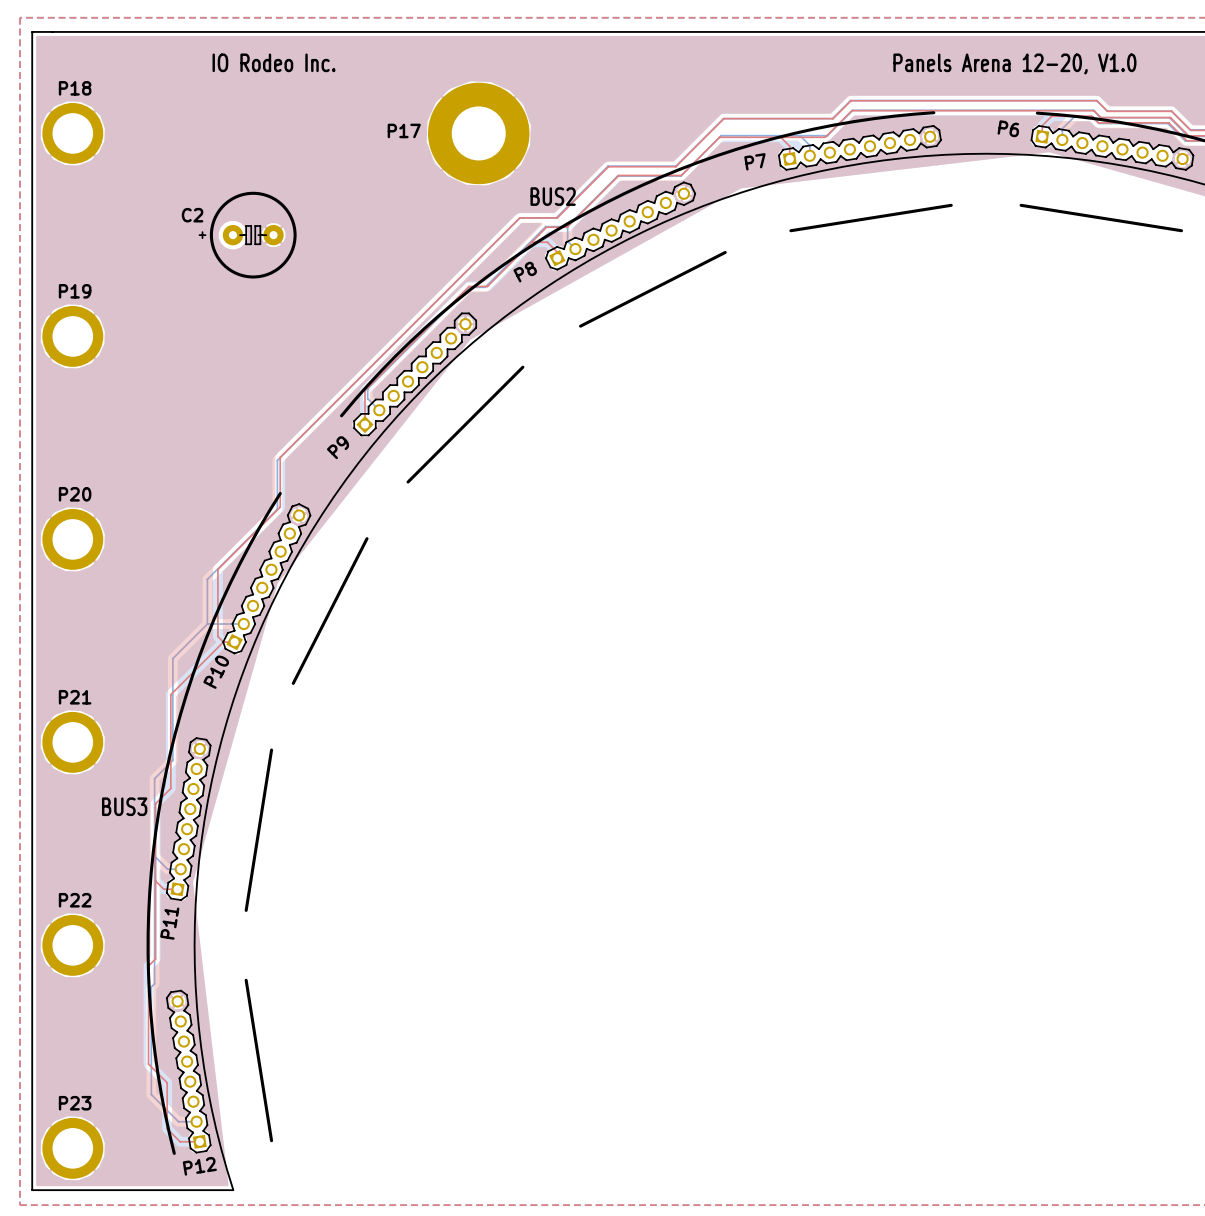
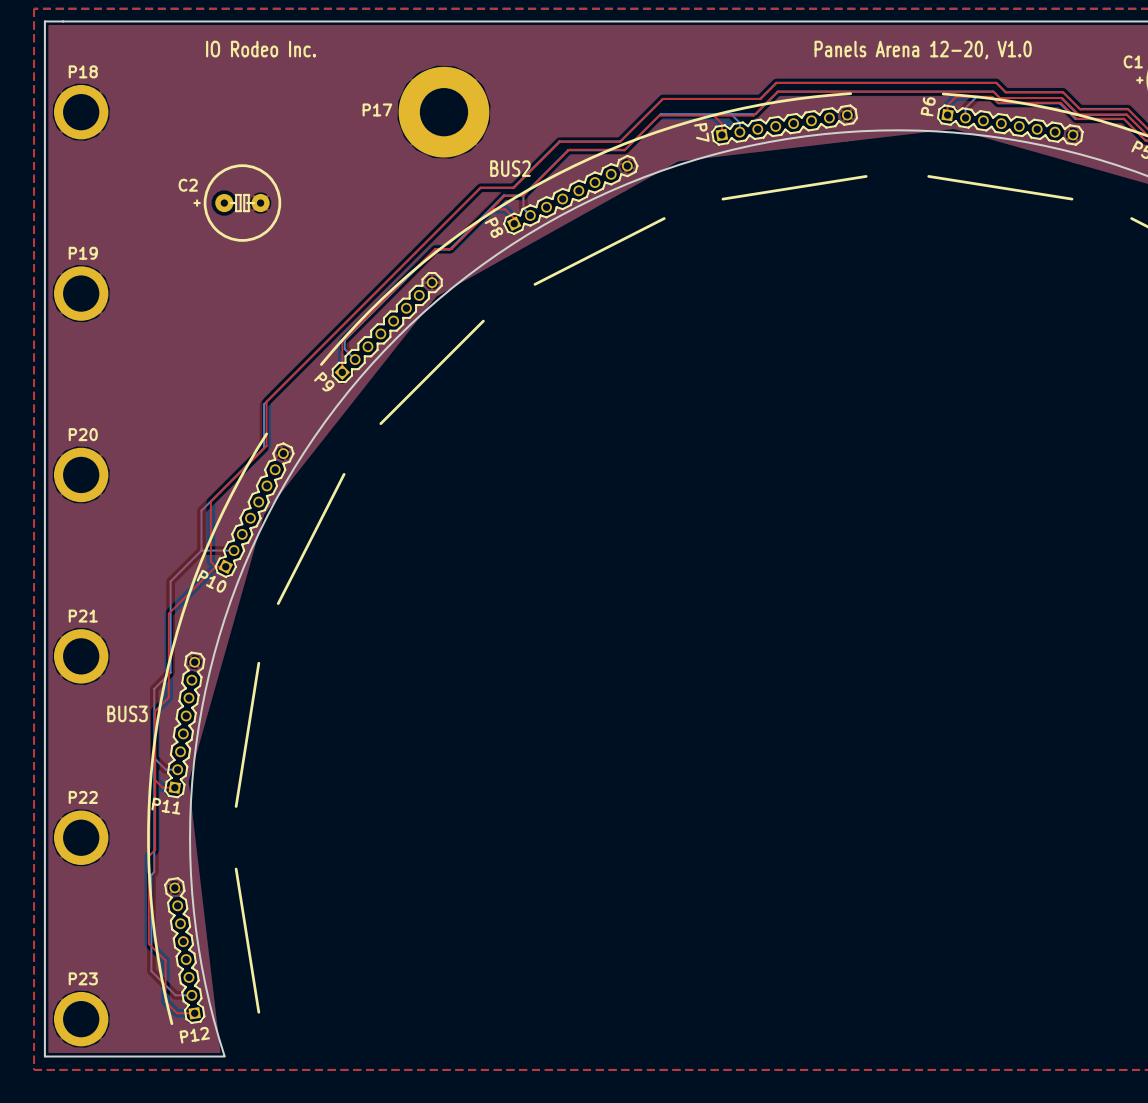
P6 name rotation: 0° (1008, 128) -> 90° counterclockwise (928, 106)
P7 name rotation: 0° (754, 161) -> 90° clockwise (701, 132)
P8 name rotation: 0° (525, 272) -> 90° clockwise (493, 227)
P9 name rotation: 0° (338, 447) -> 90° clockwise (324, 381)
P10 name rotation: 0° (216, 672) -> 90° clockwise (211, 581)
P11 name rotation: 0° (169, 923) -> 90° clockwise (165, 806)

